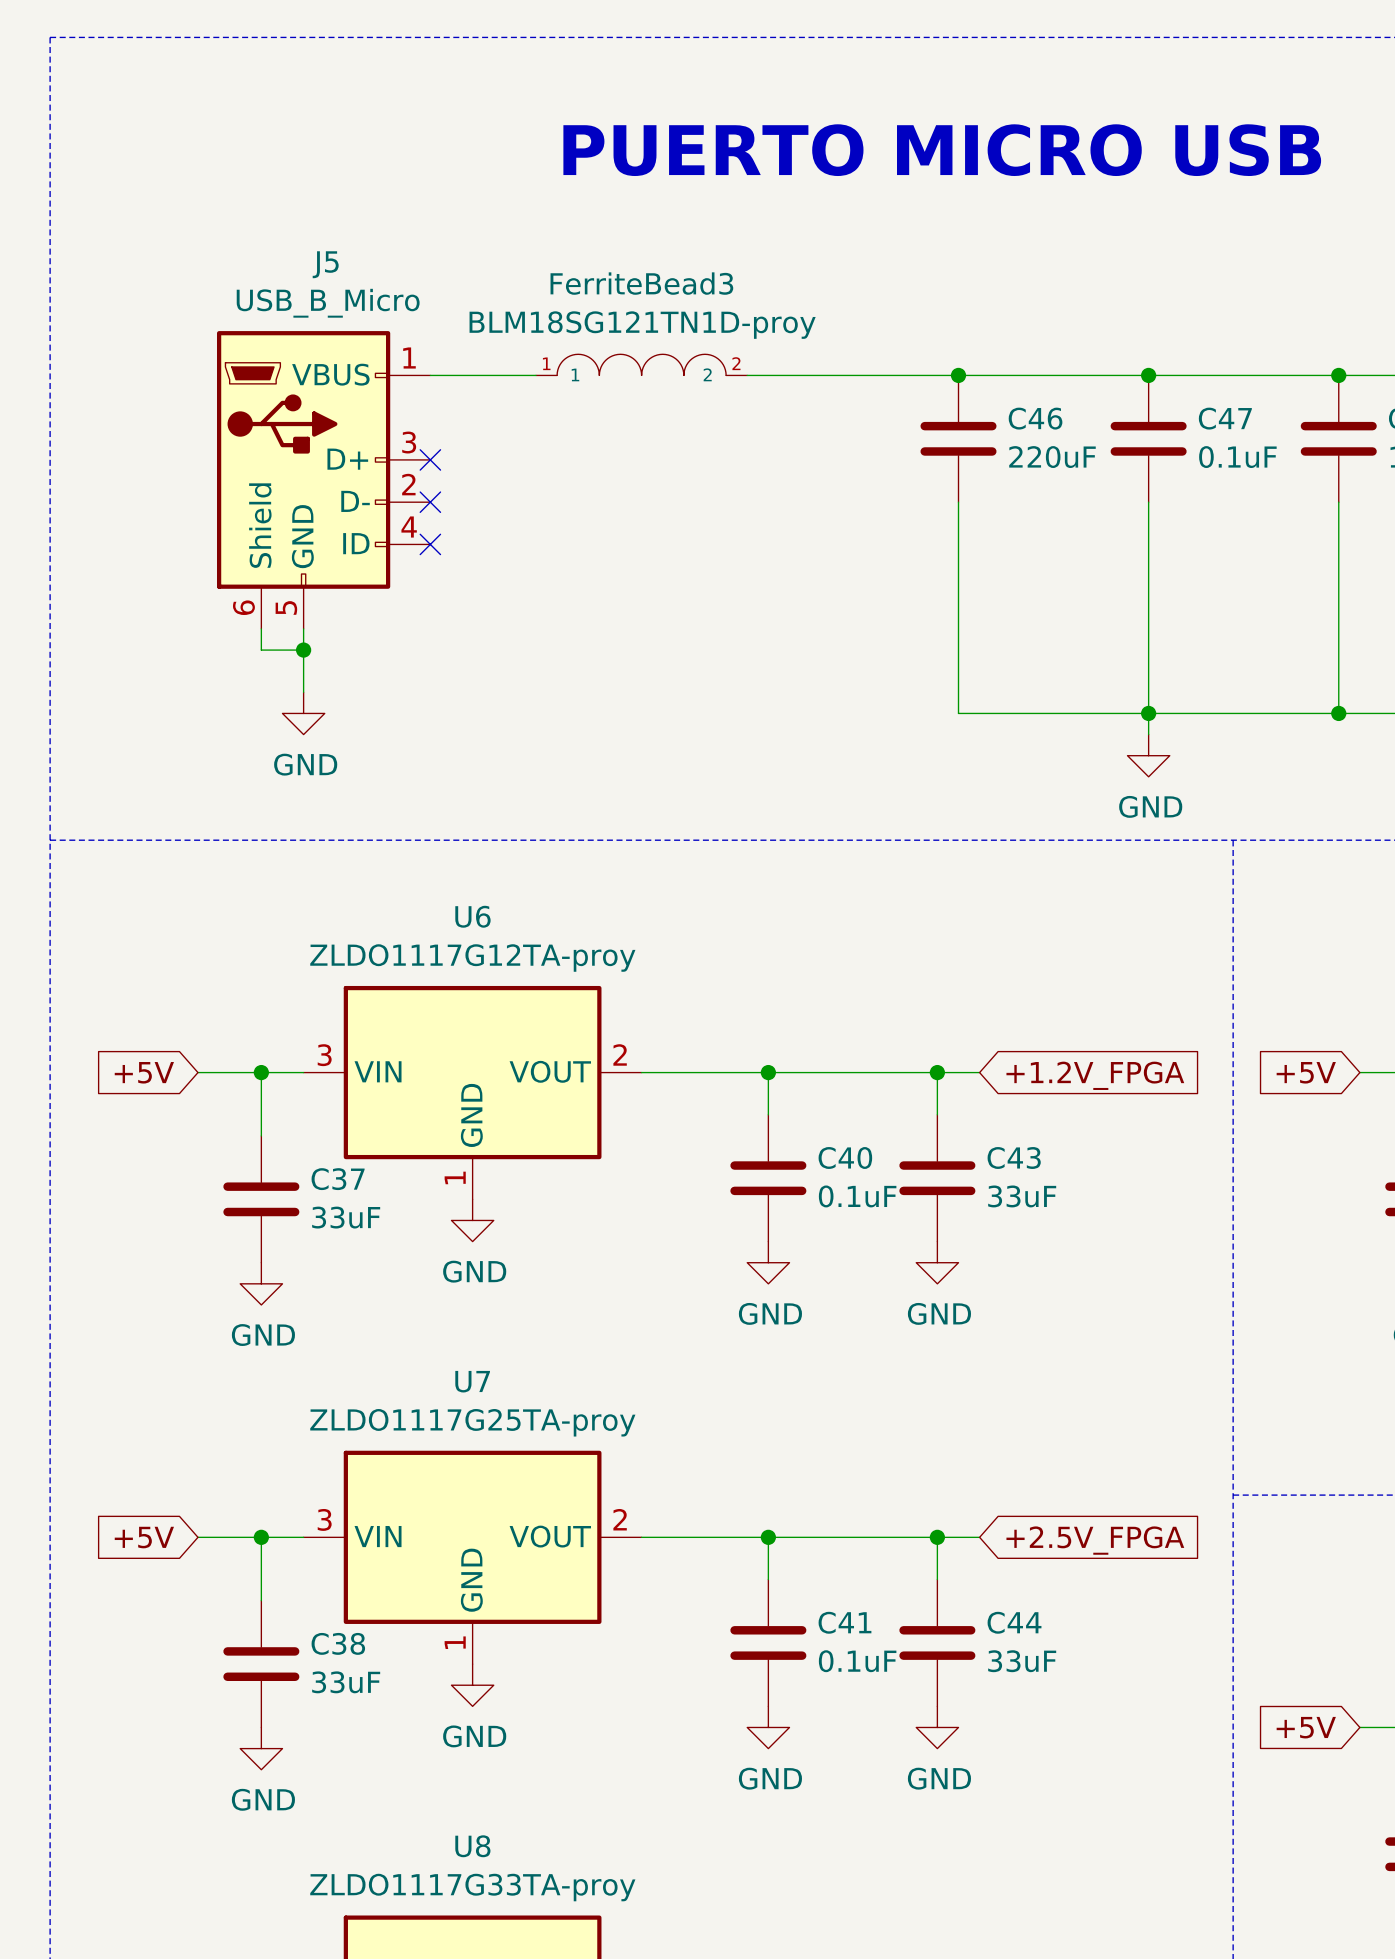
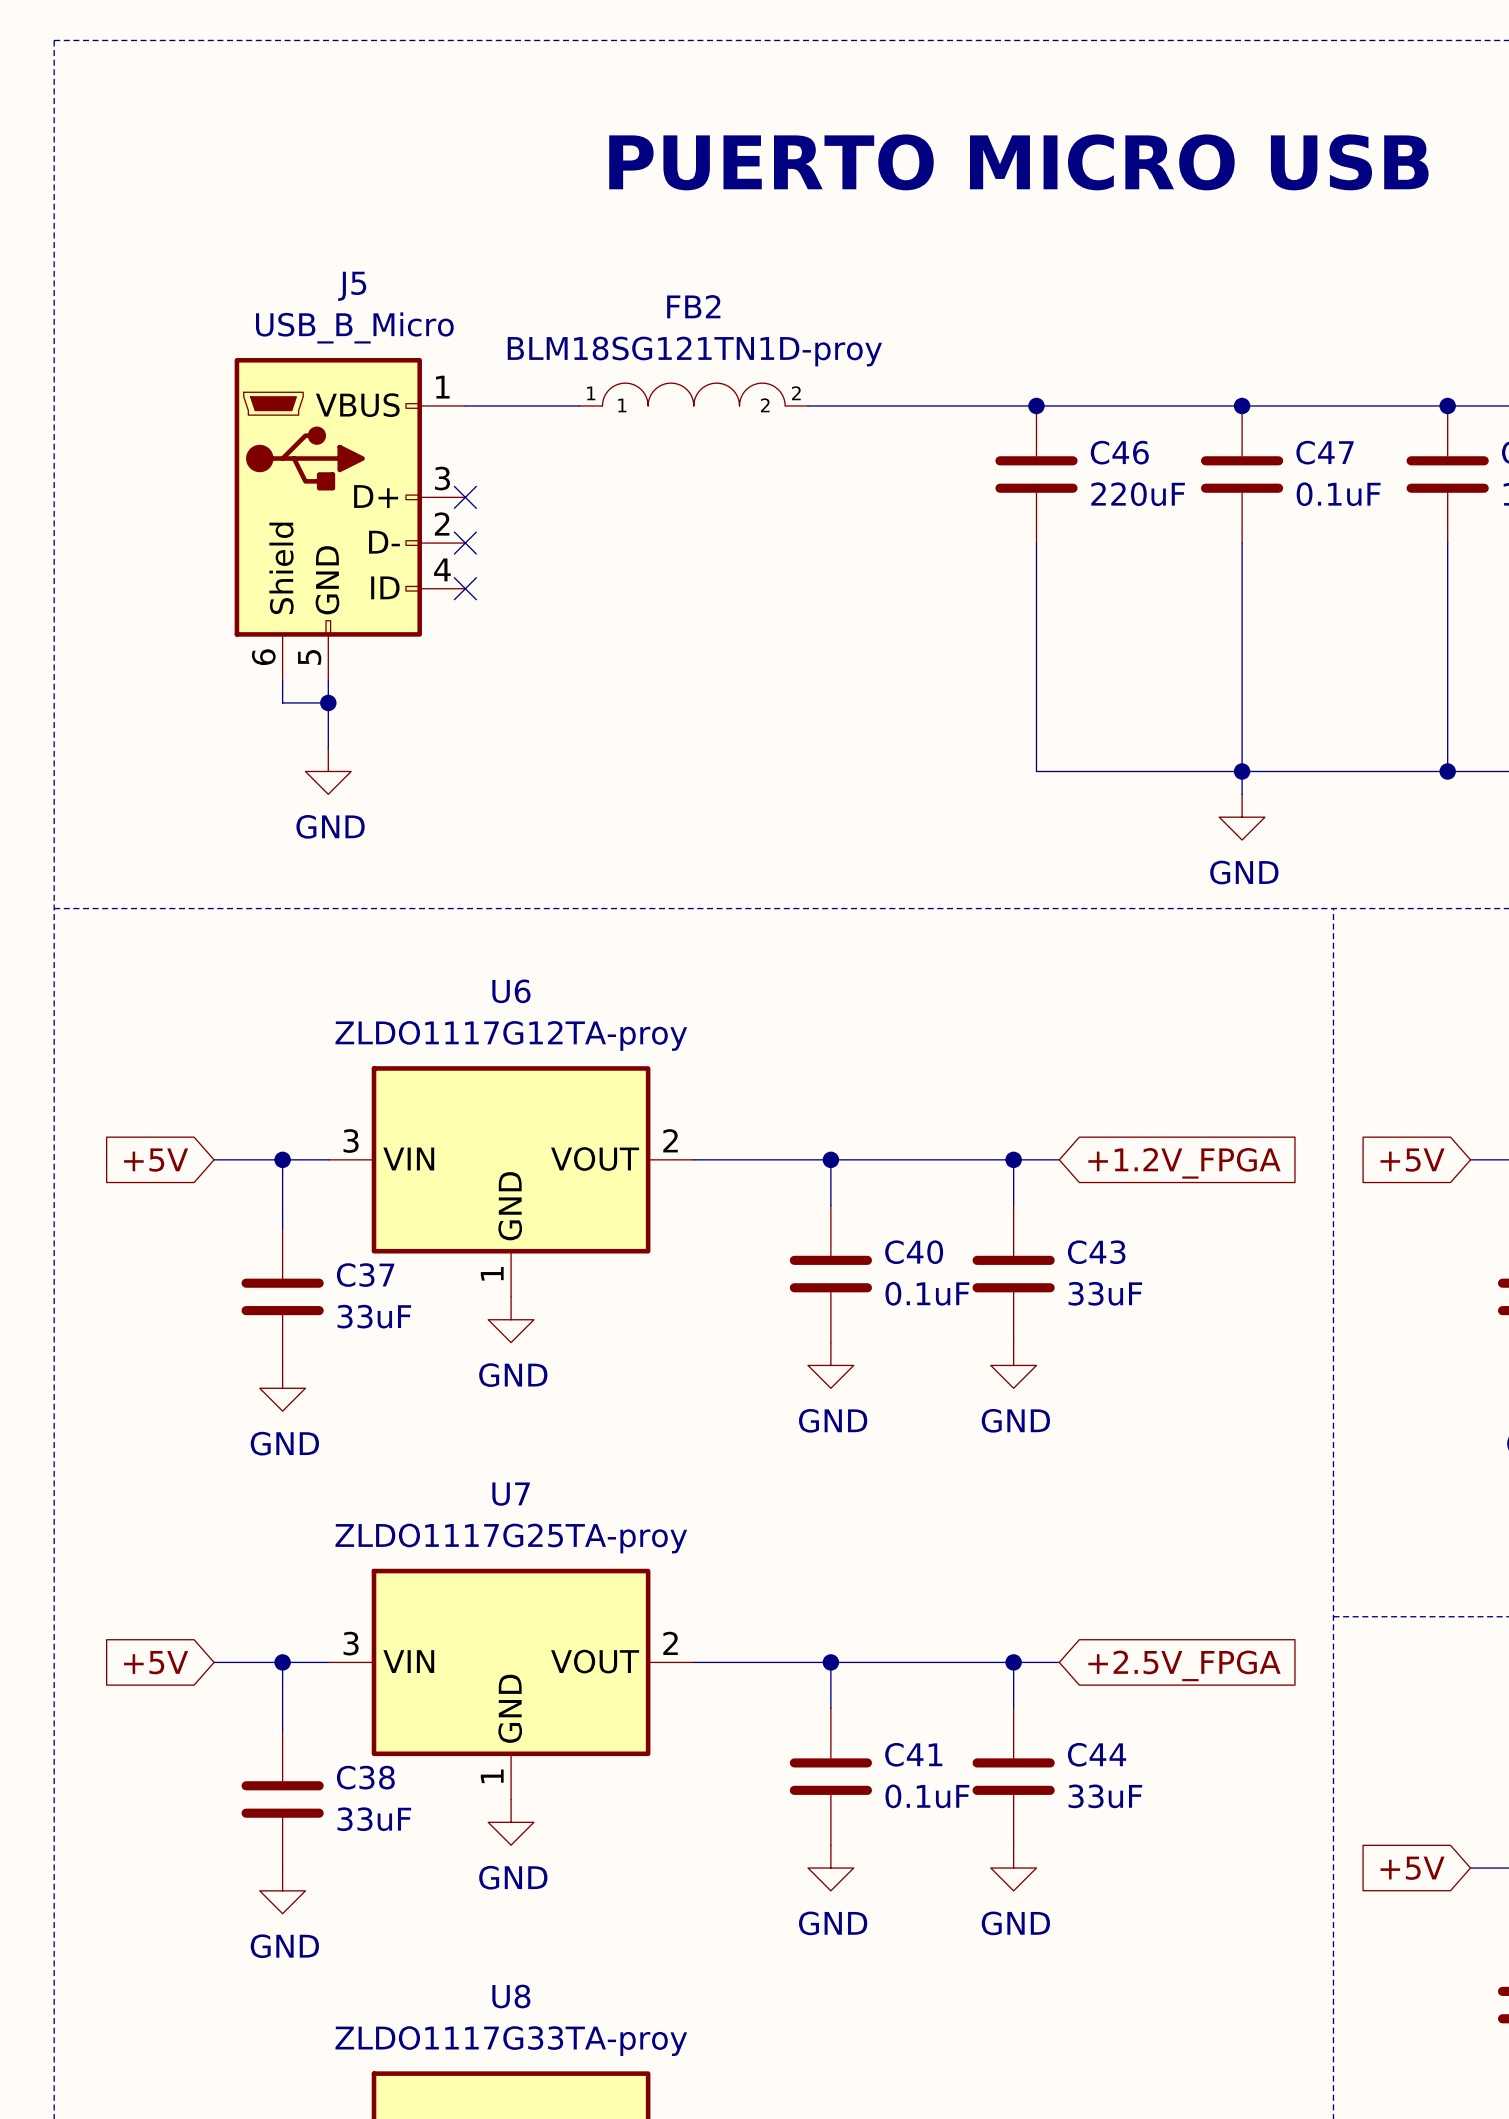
FerriteBead3 name: FerriteBead3 (641, 283) -> FB2 (693, 306)

